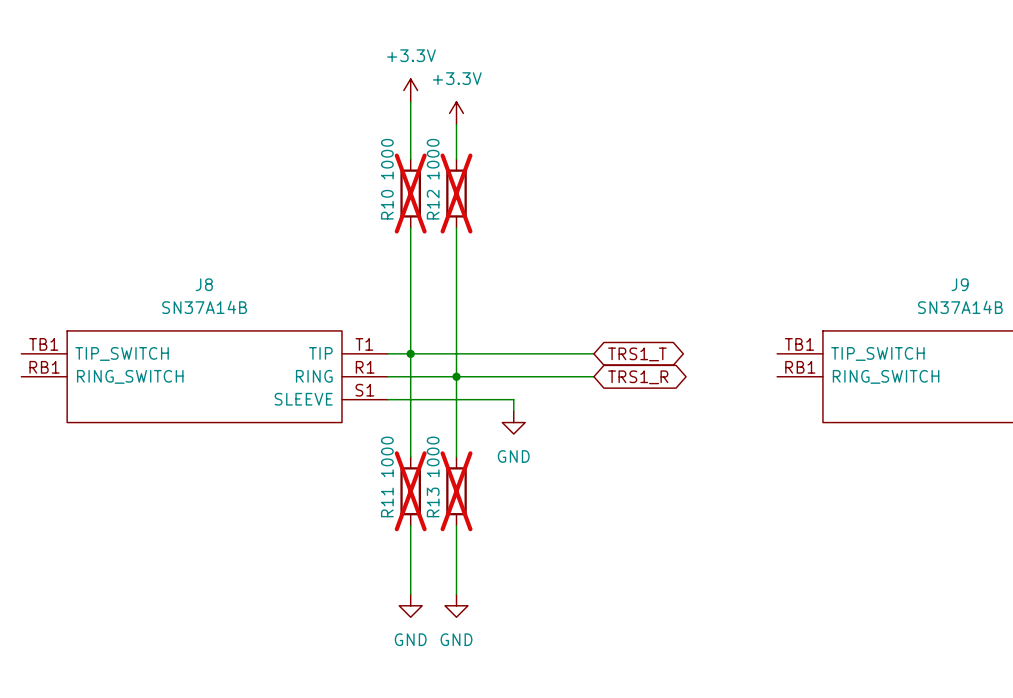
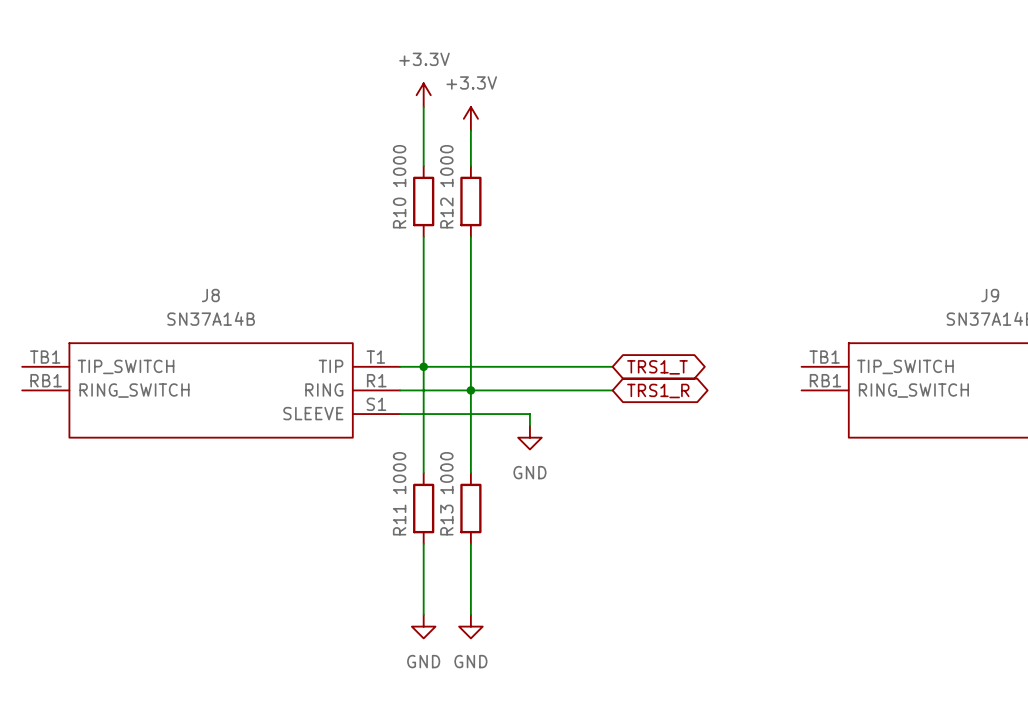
R10 do-not-place cross: (410, 193) -> none
R12 do-not-place cross: (456, 193) -> none
R11 do-not-place cross: (410, 491) -> none
R13 do-not-place cross: (456, 491) -> none

